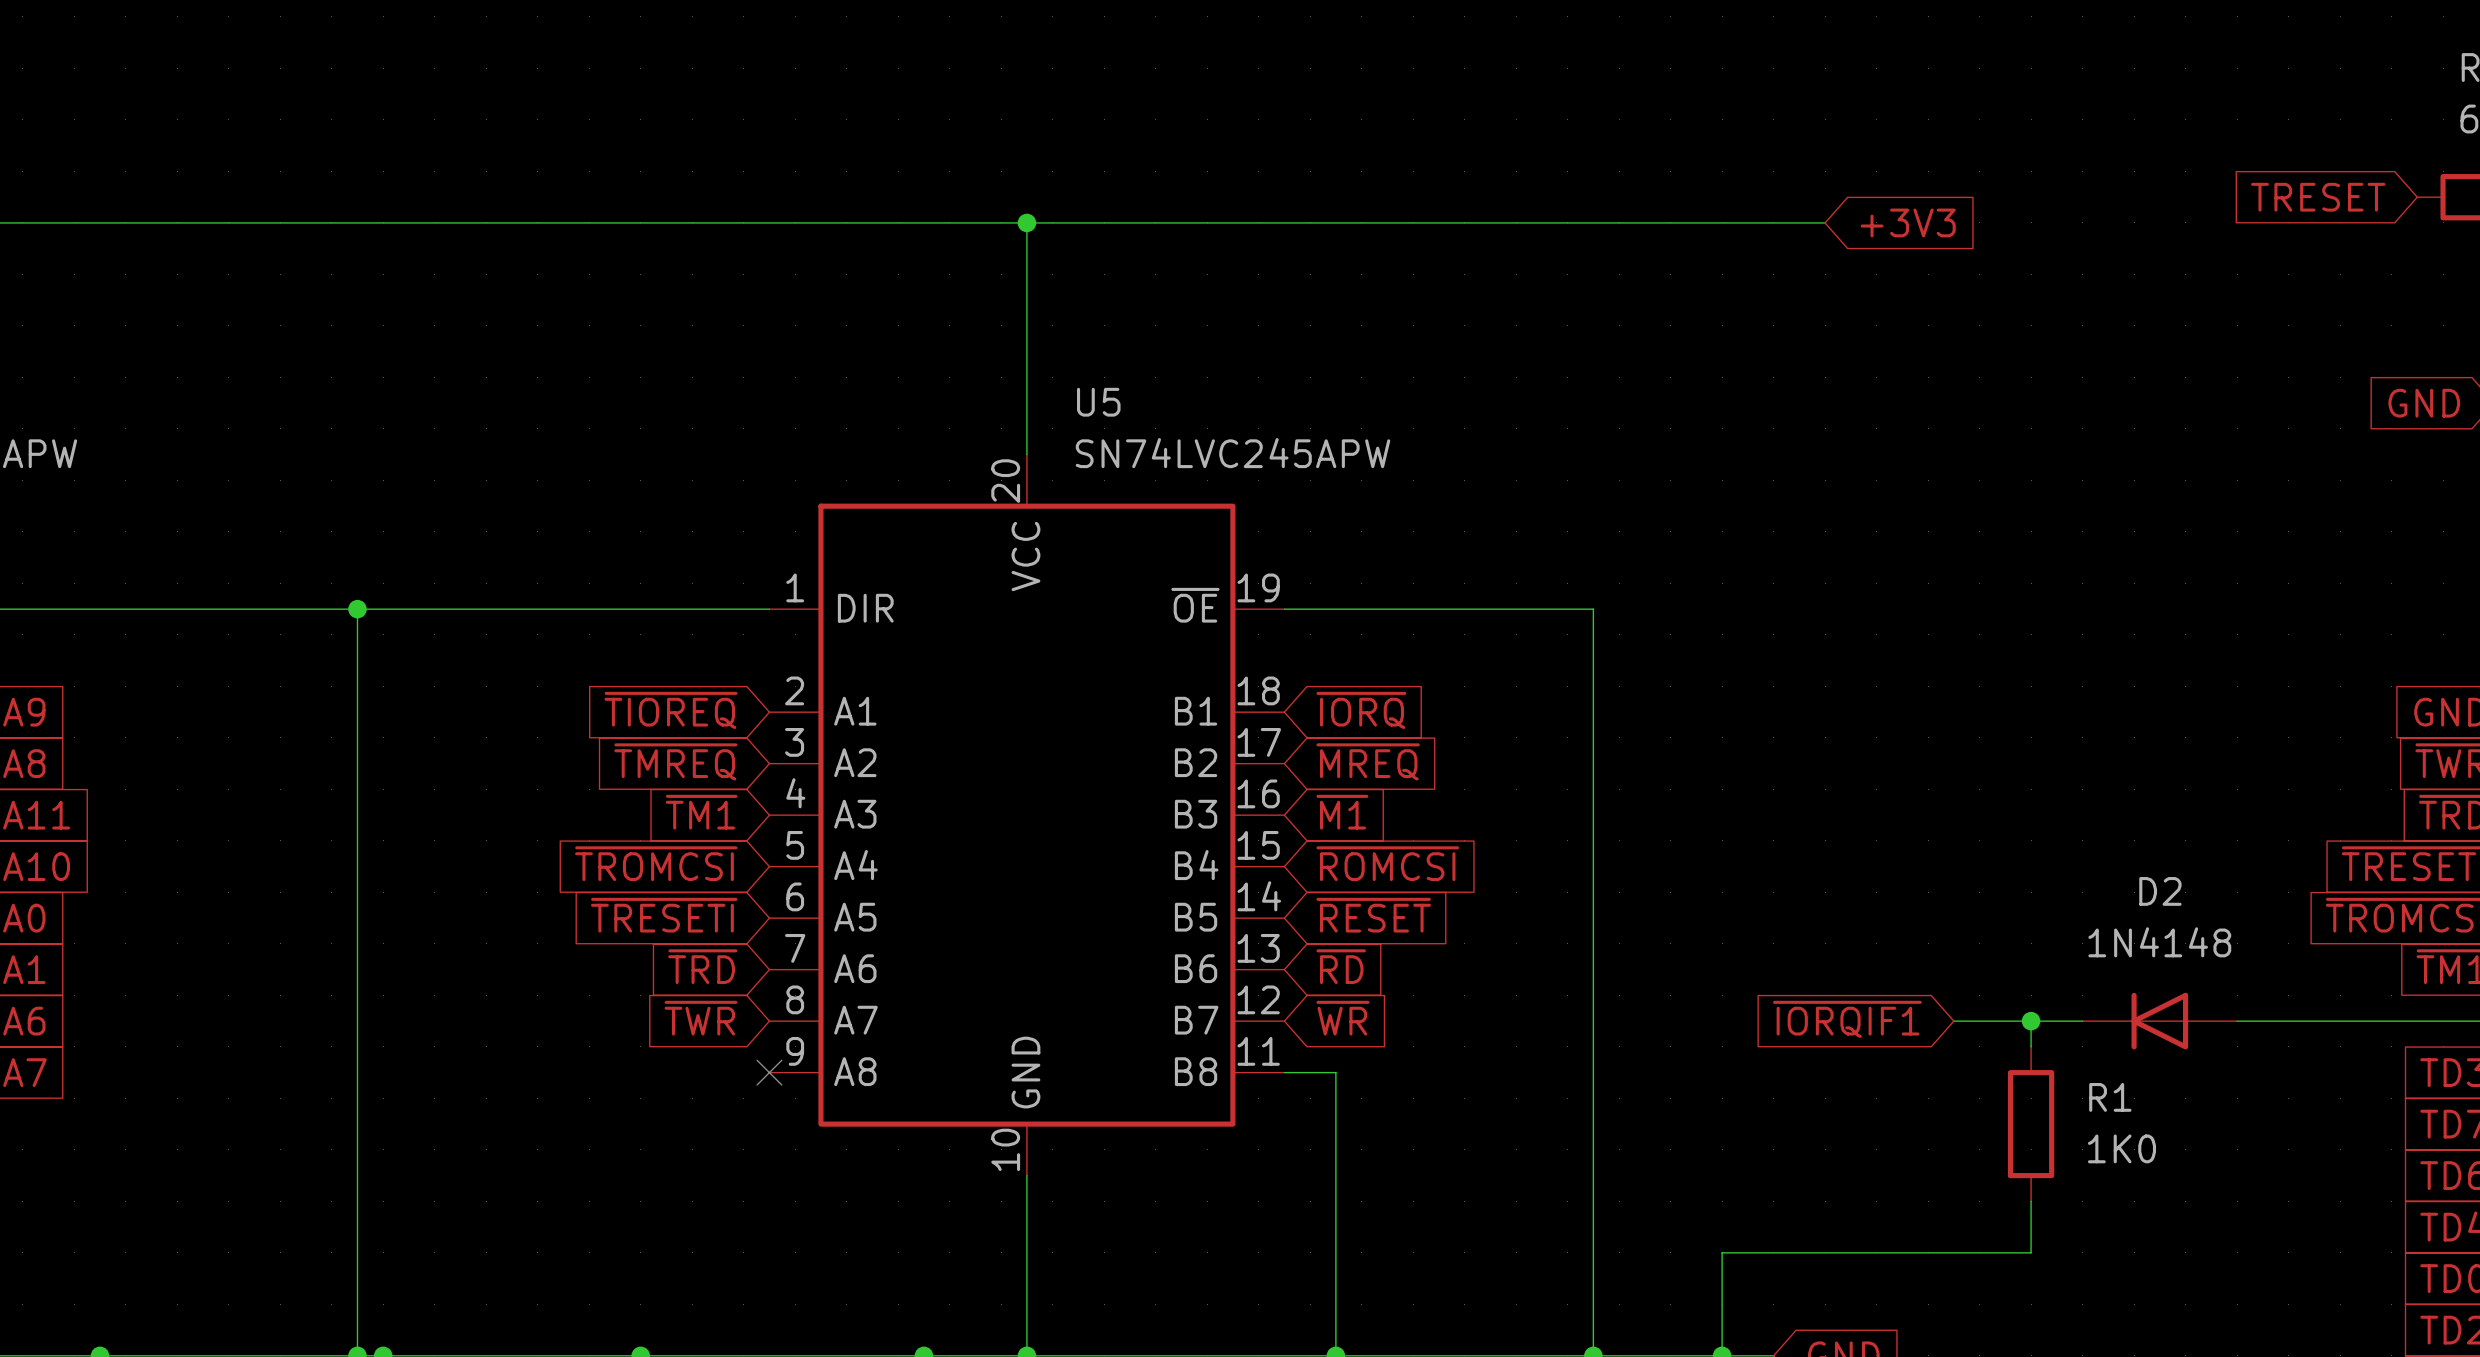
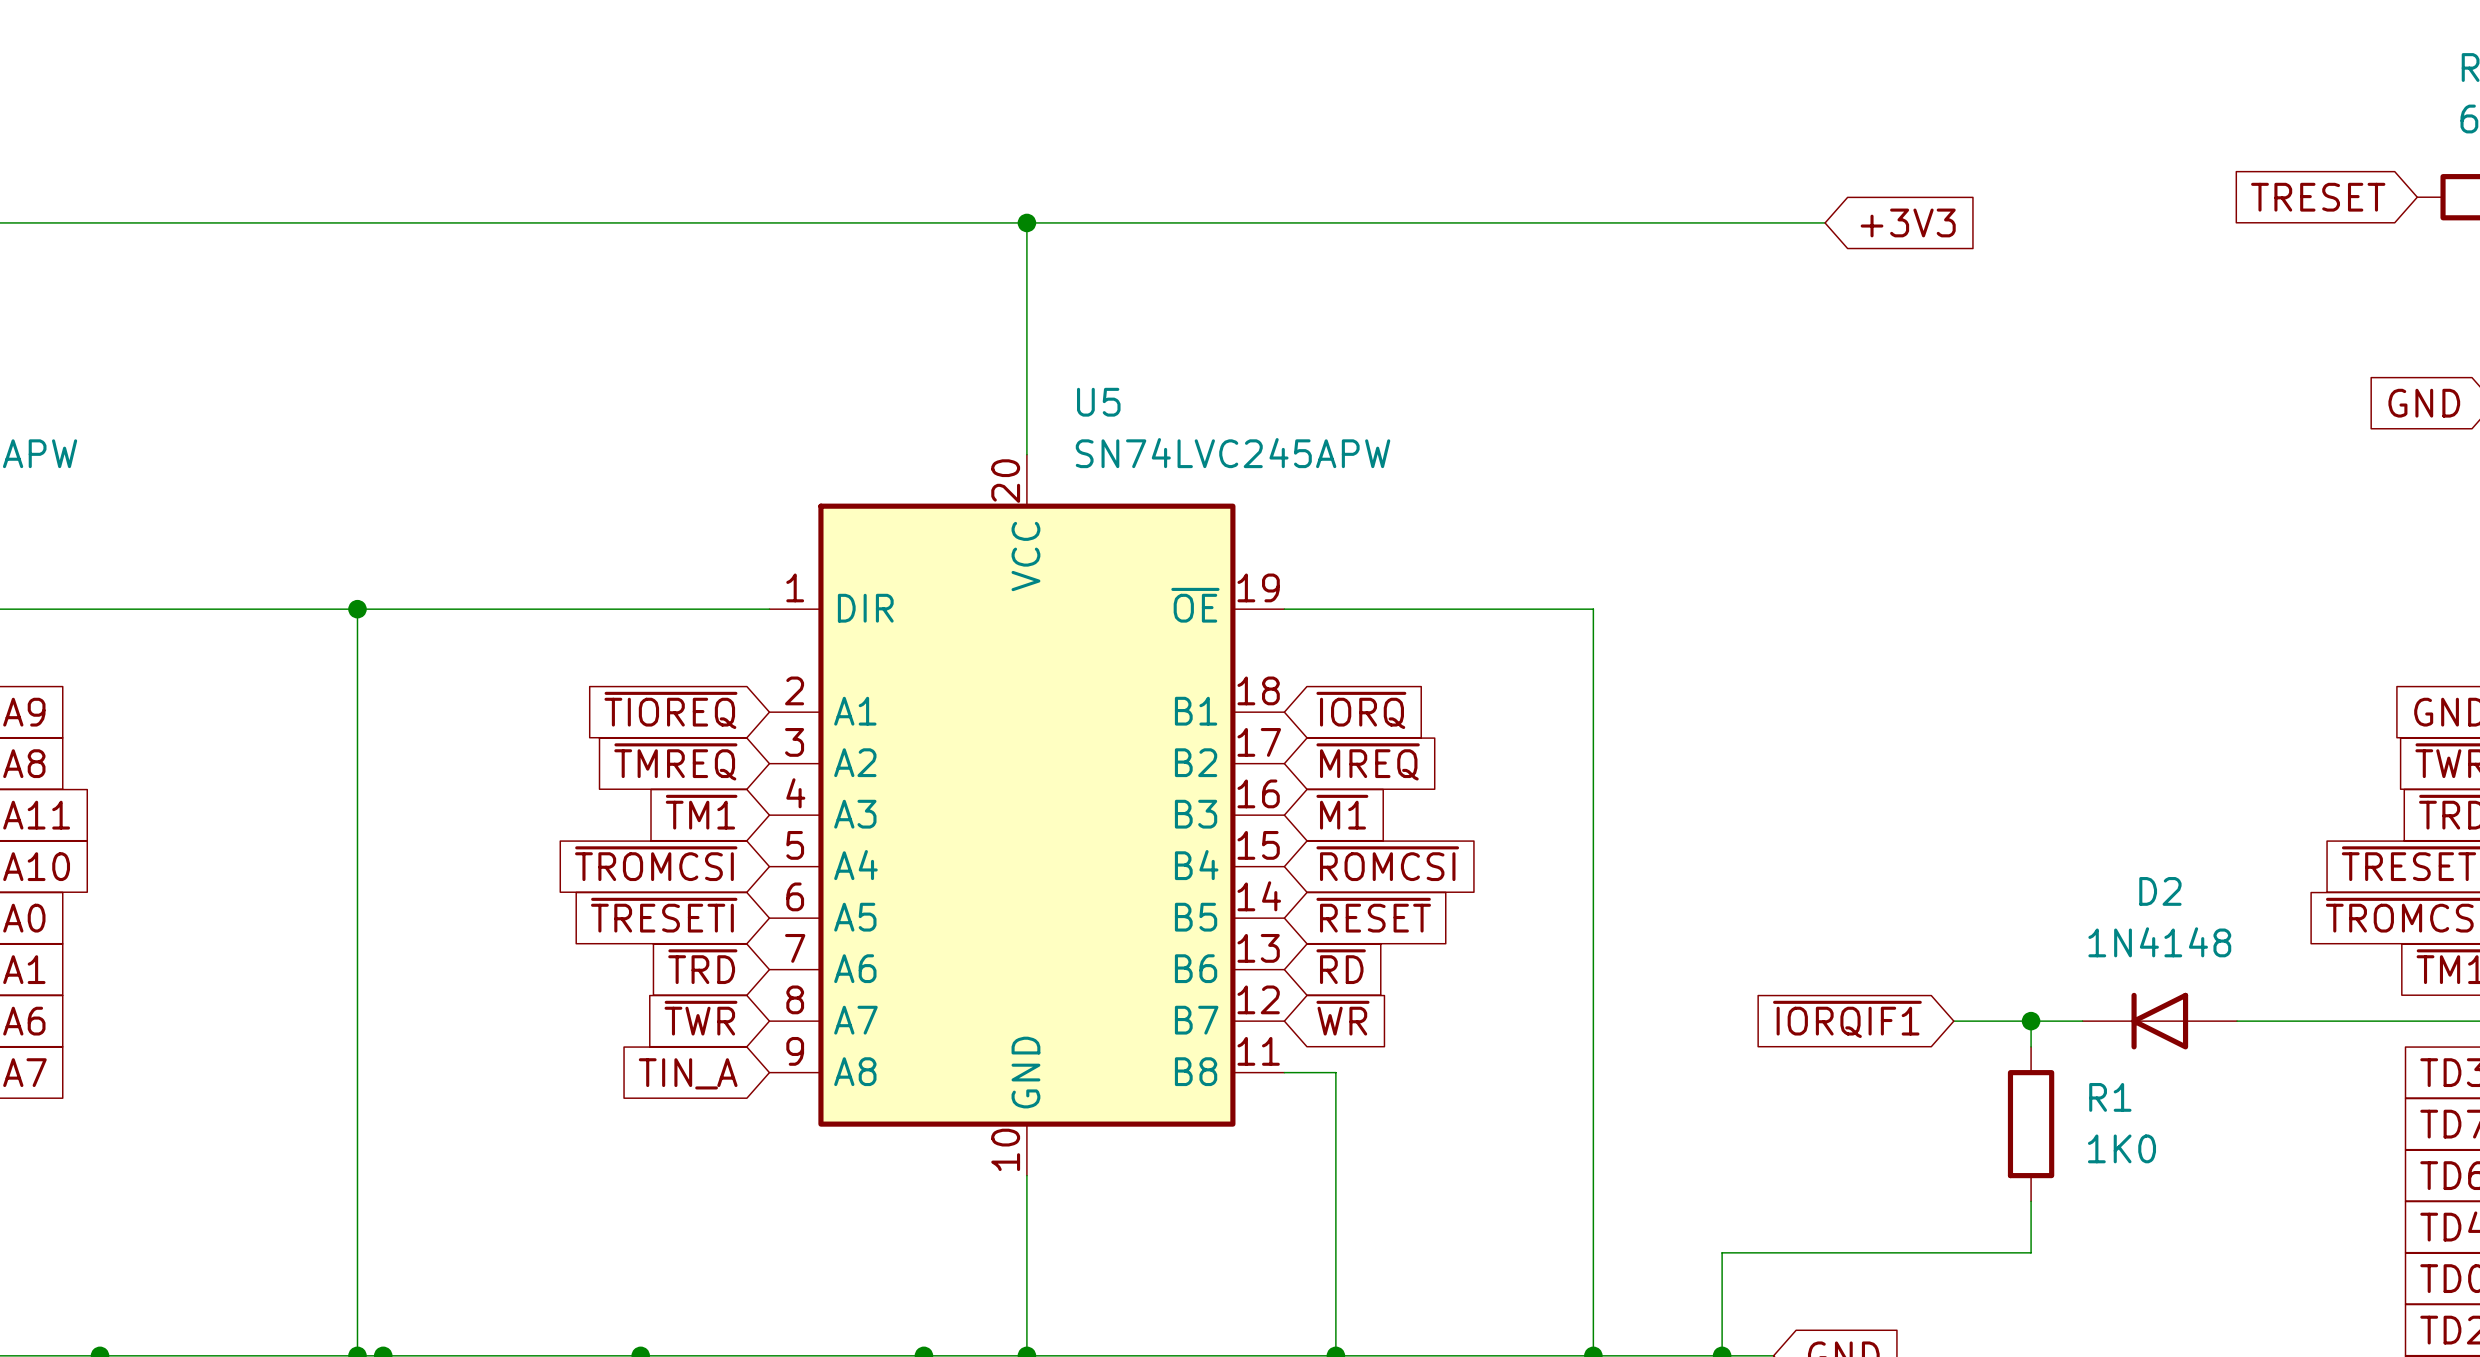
no-connect mark: (769, 1072) -> none
global label: none -> TIN_A (688, 1073)

